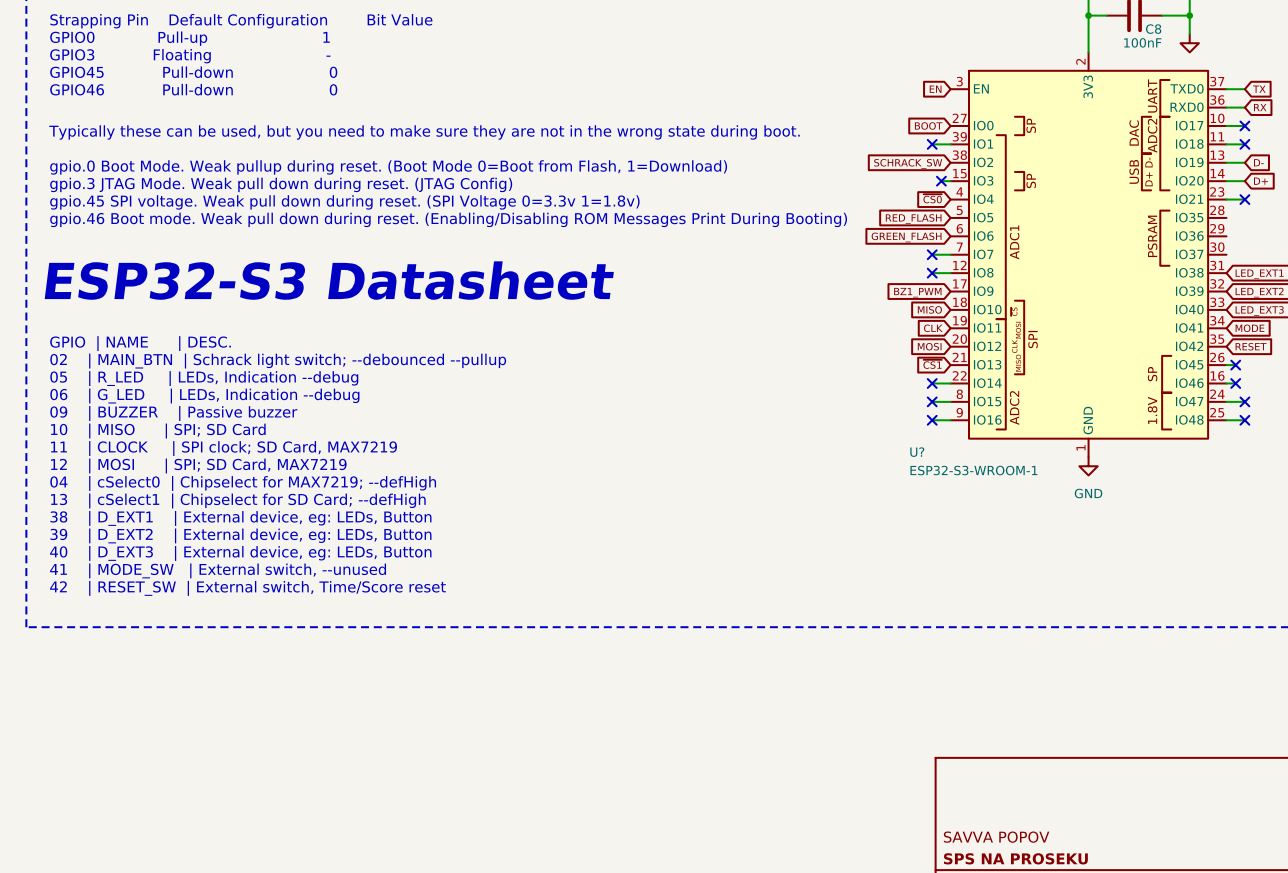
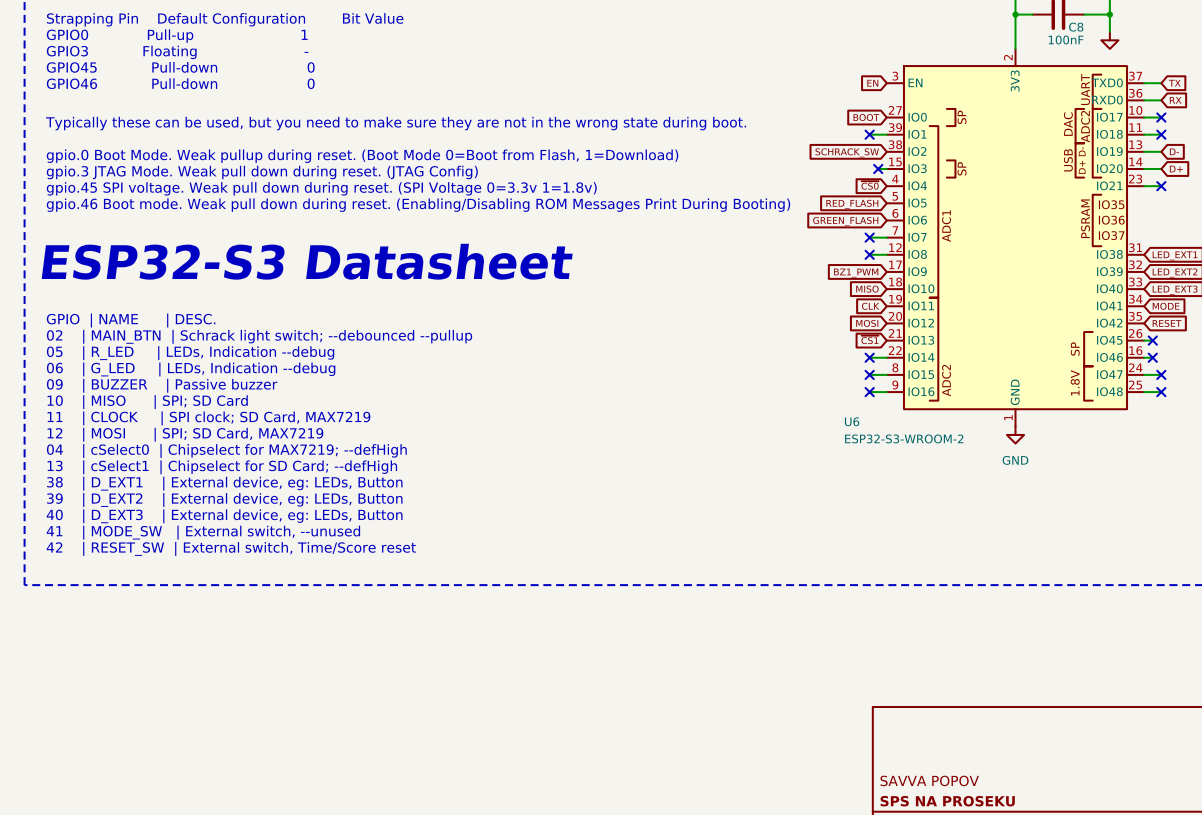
U?: ESP32-S3-WROOM-1 (1088, 254) -> none
U6: none -> ESP32-S3-WROOM-2 (1015, 237)

